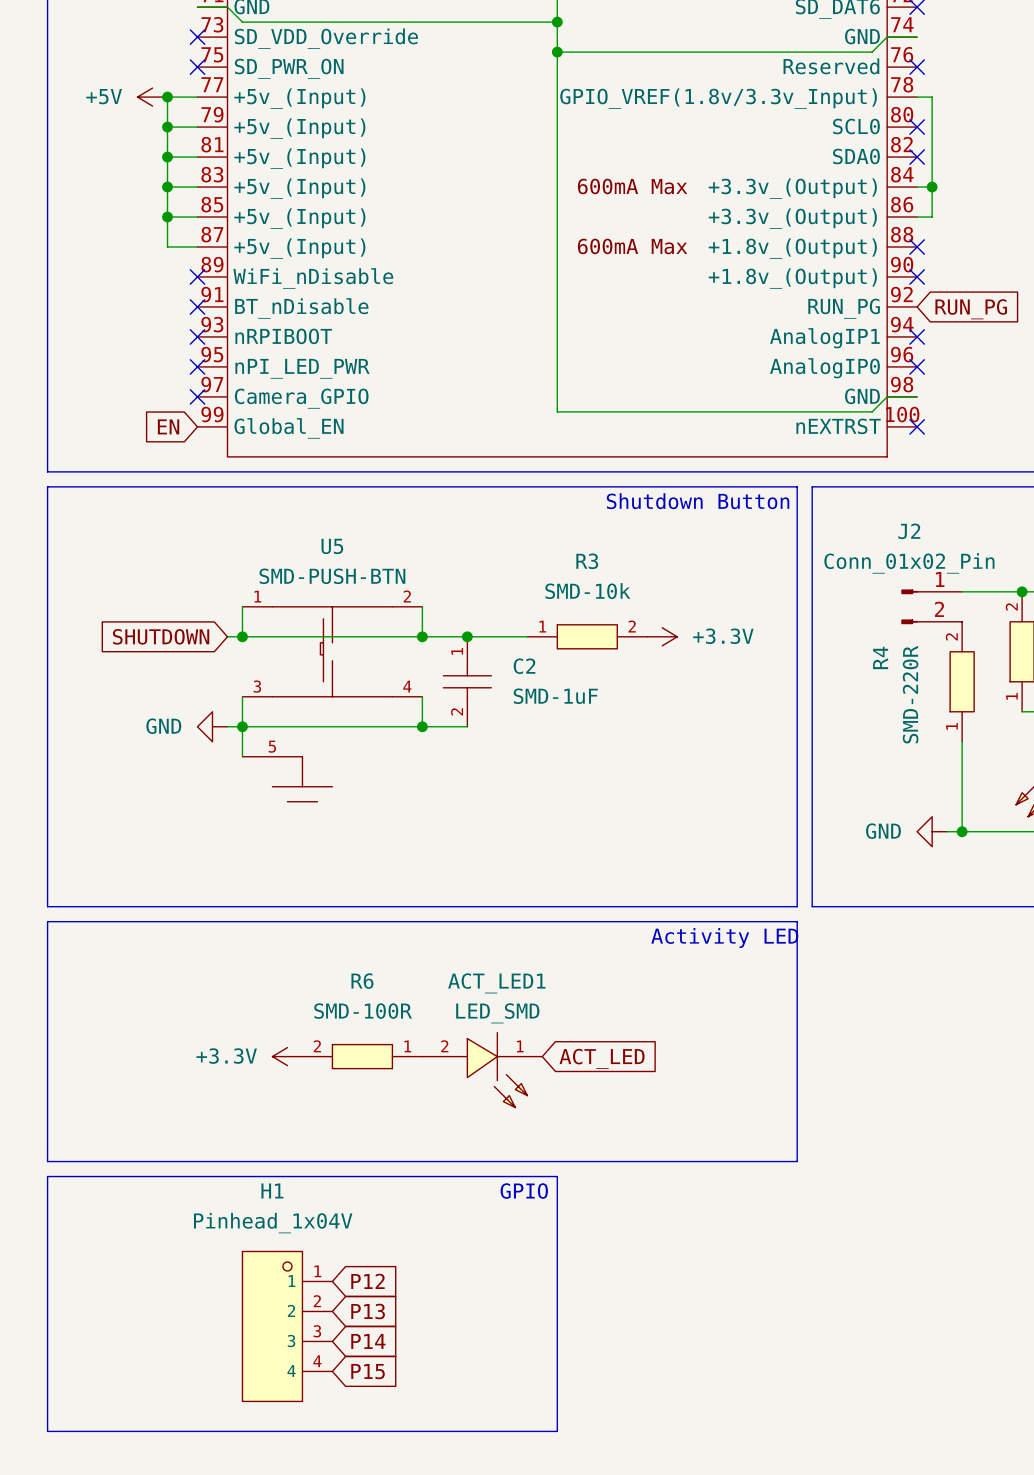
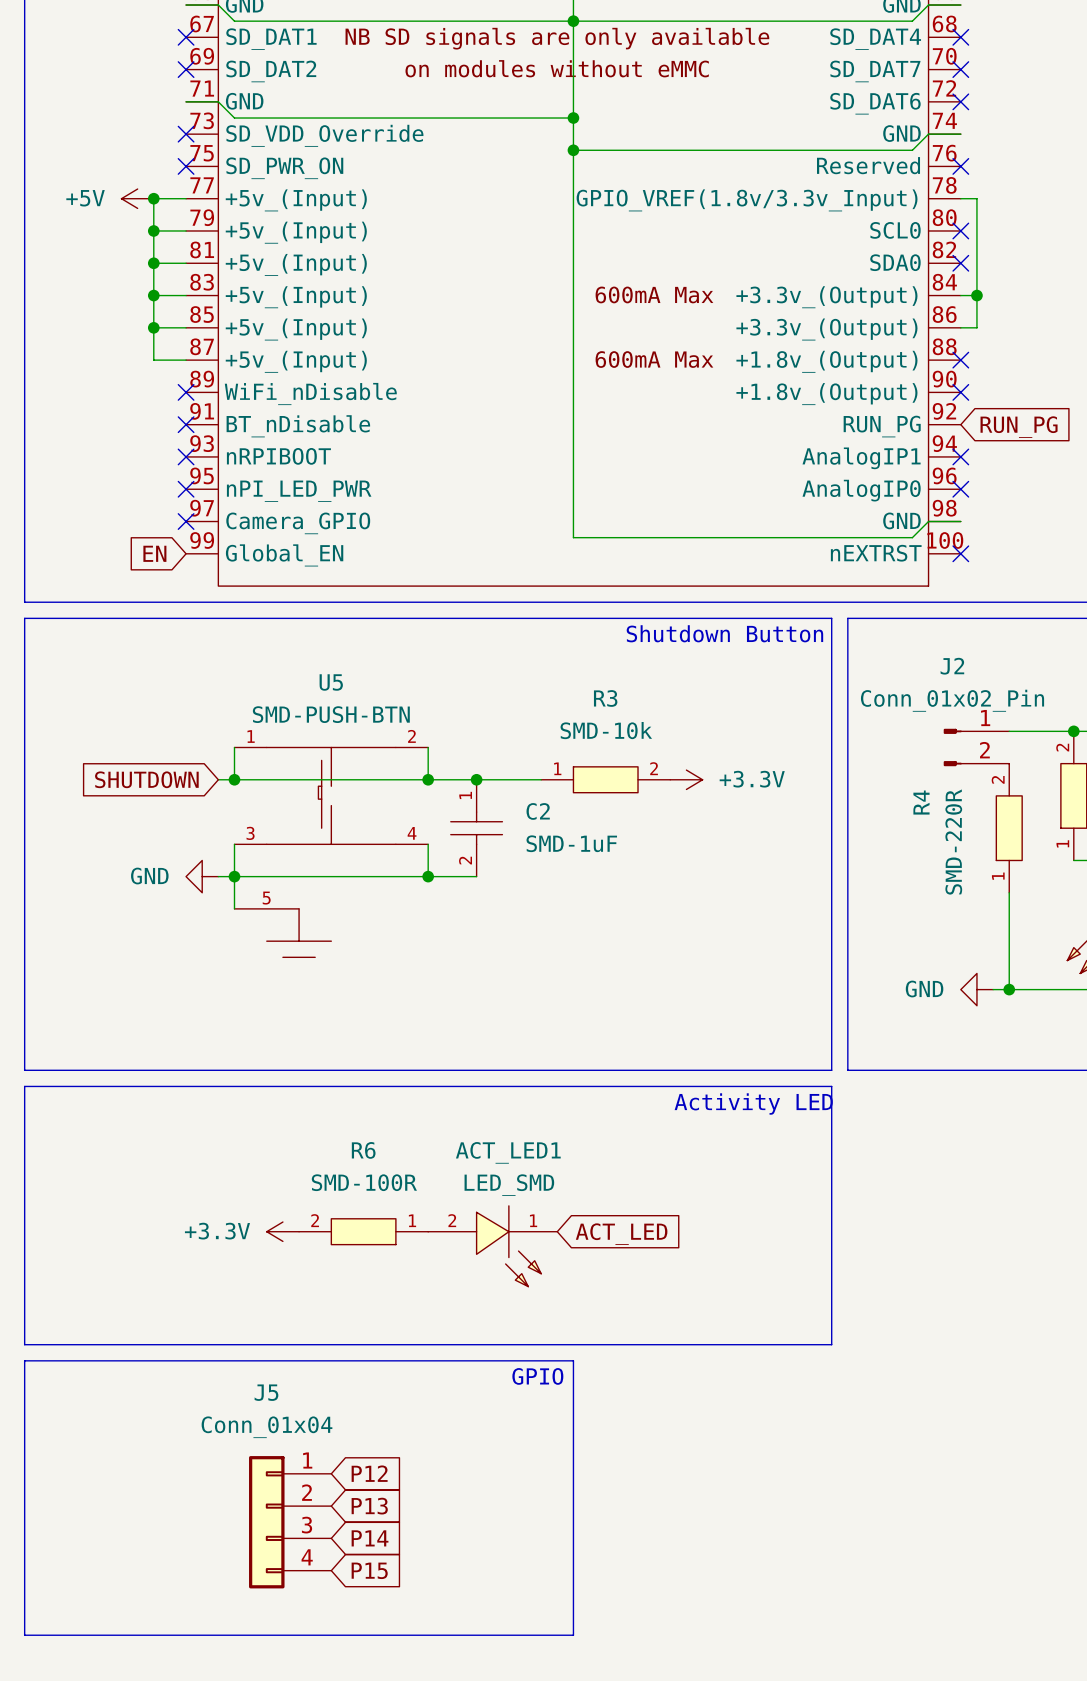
H1: Pinhead_1x04V (287, 1326) -> none
J5: none -> Conn_01x04 (290, 1522)

